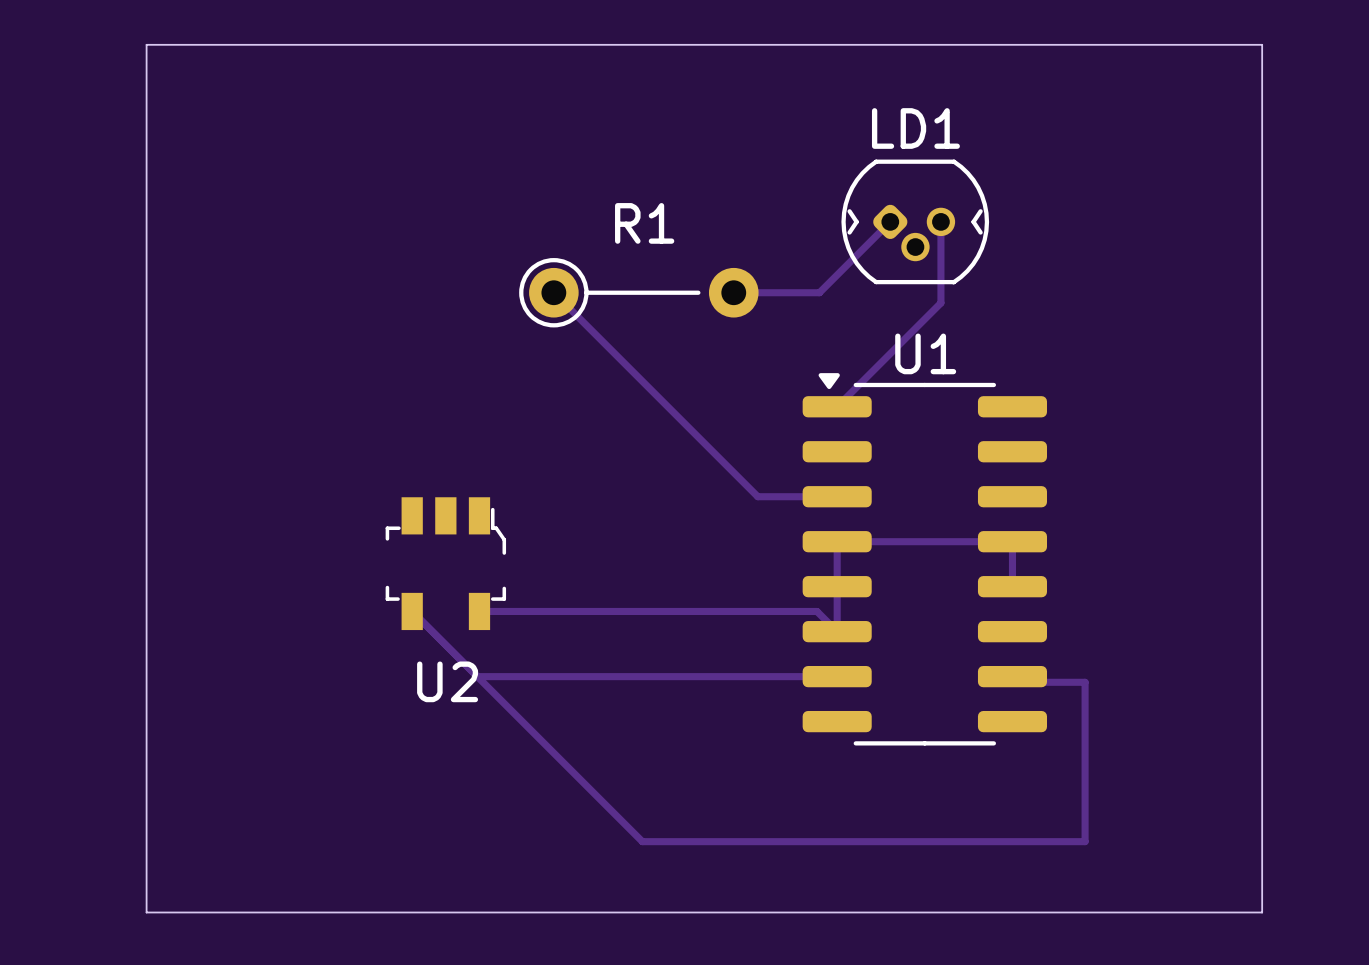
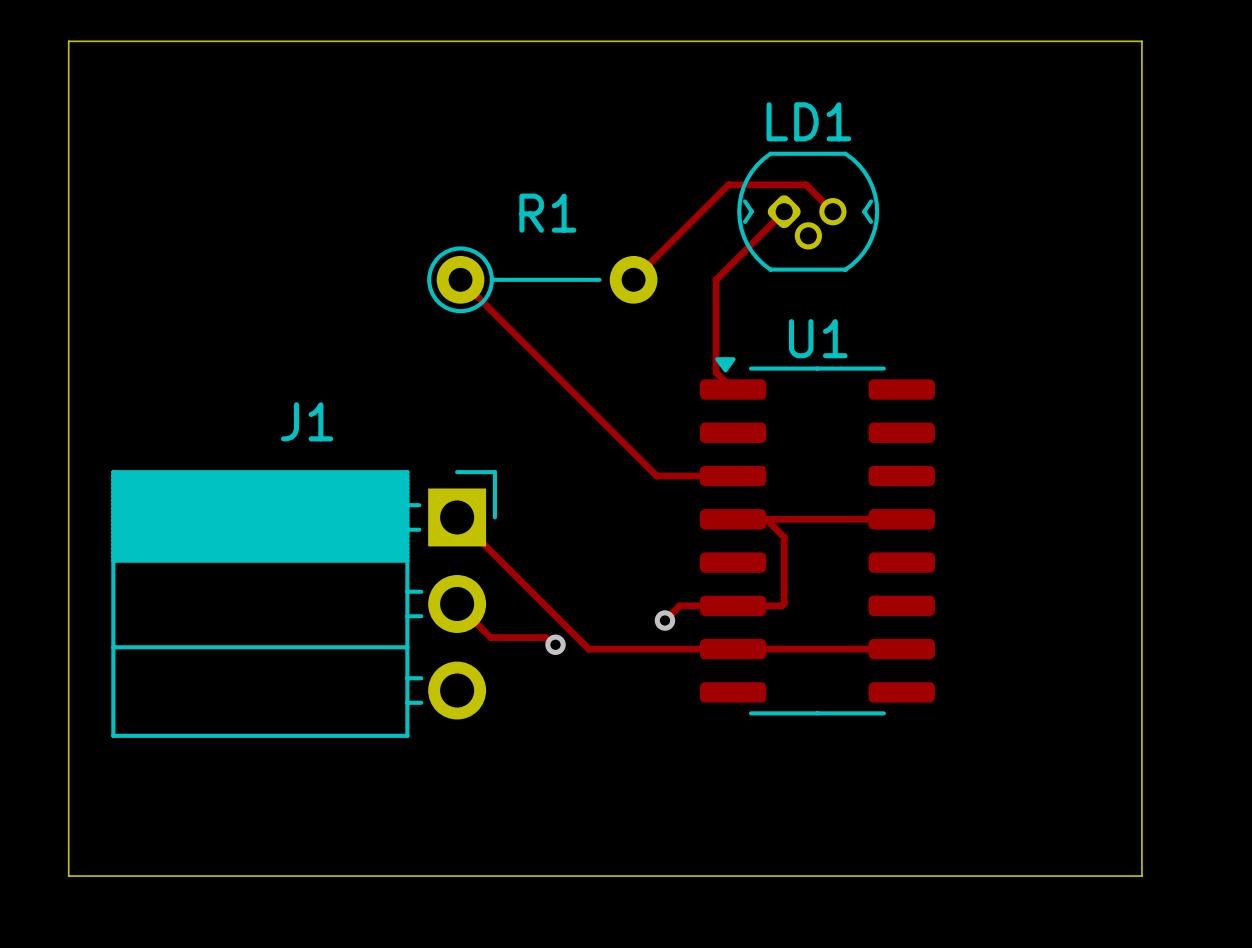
track: (940, 221) (940, 303) (837, 406) -> (716, 279) (716, 372) (733, 389)
track: (733, 292) (819, 292) -> (633, 279) (728, 184) (806, 184) (832, 211)
track: (837, 541) (837, 631) (816, 611) (479, 611) -> none
track: none -> (766, 519) (784, 537) (784, 603) (781, 605) (679, 605) (664, 620)
track: (1012, 541) (1012, 586) -> none
U2: (445, 563) -> none
track: (412, 611) (642, 841) (1085, 841) (1085, 682) (1018, 682) -> none
J1: none -> (304, 603)
track: none -> (457, 603) (490, 637) (545, 637) (552, 644) (555, 644)
via: none -> (664, 620)
via: none -> (555, 644)
track: (477, 676) (687, 676) -> (457, 517) (588, 649)
track: none -> (733, 649) (901, 649)

